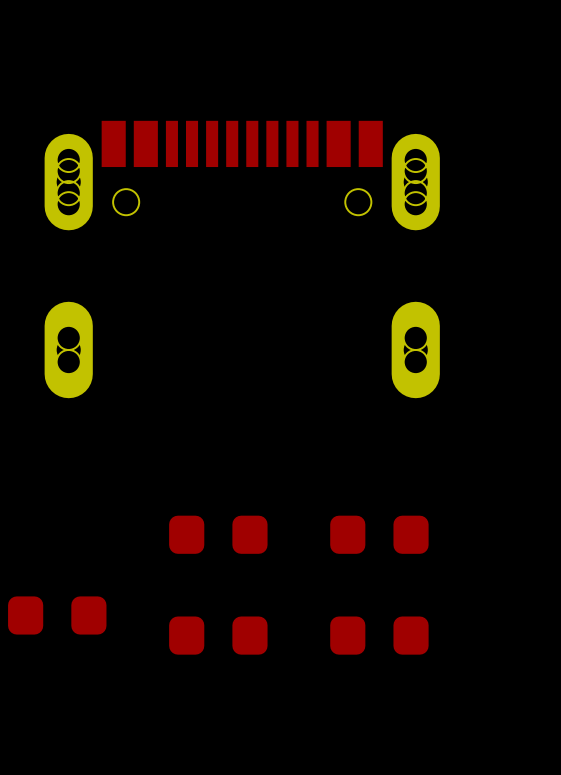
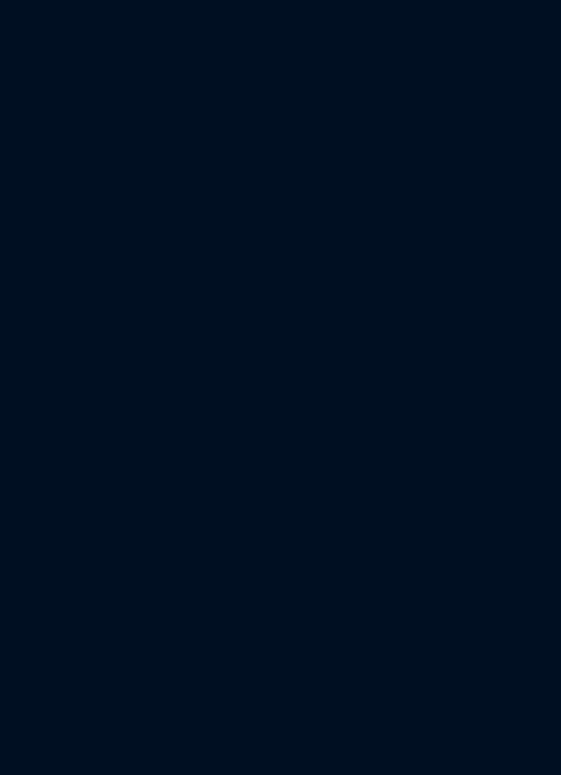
part: (242, 259) -> none
part: (218, 534) -> none
part: (379, 534) -> none
part: (57, 615) -> none
part: (218, 635) -> none
part: (379, 635) -> none

